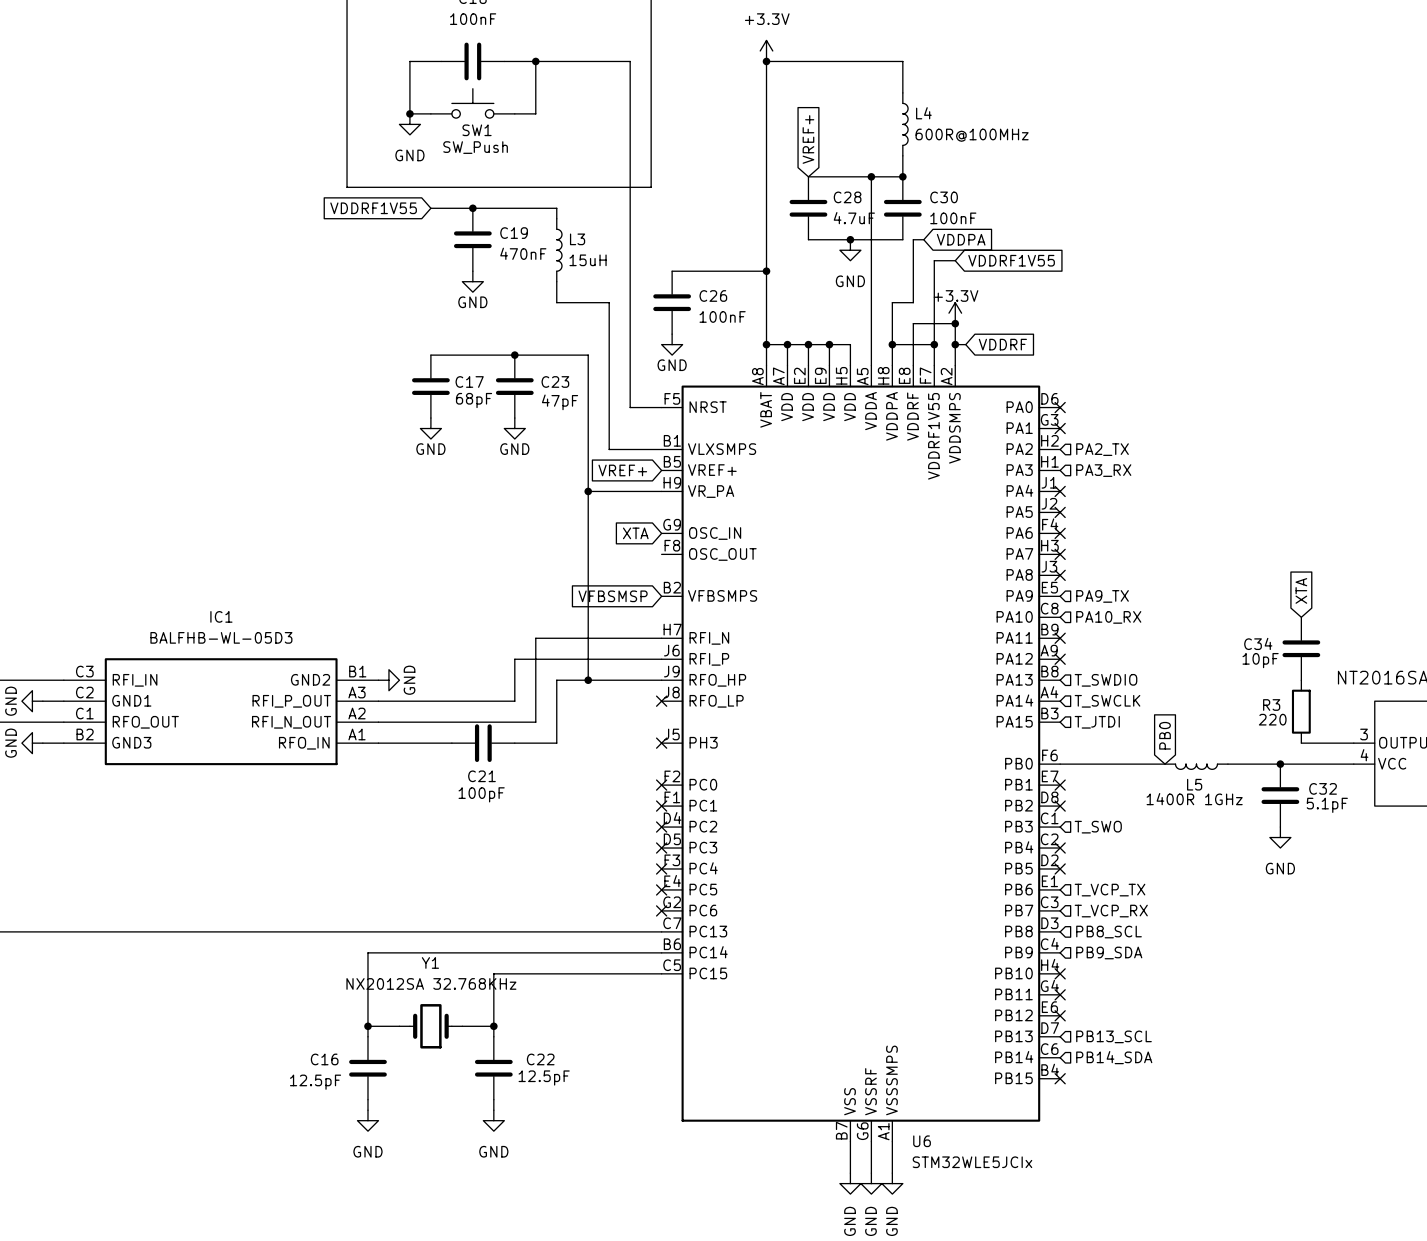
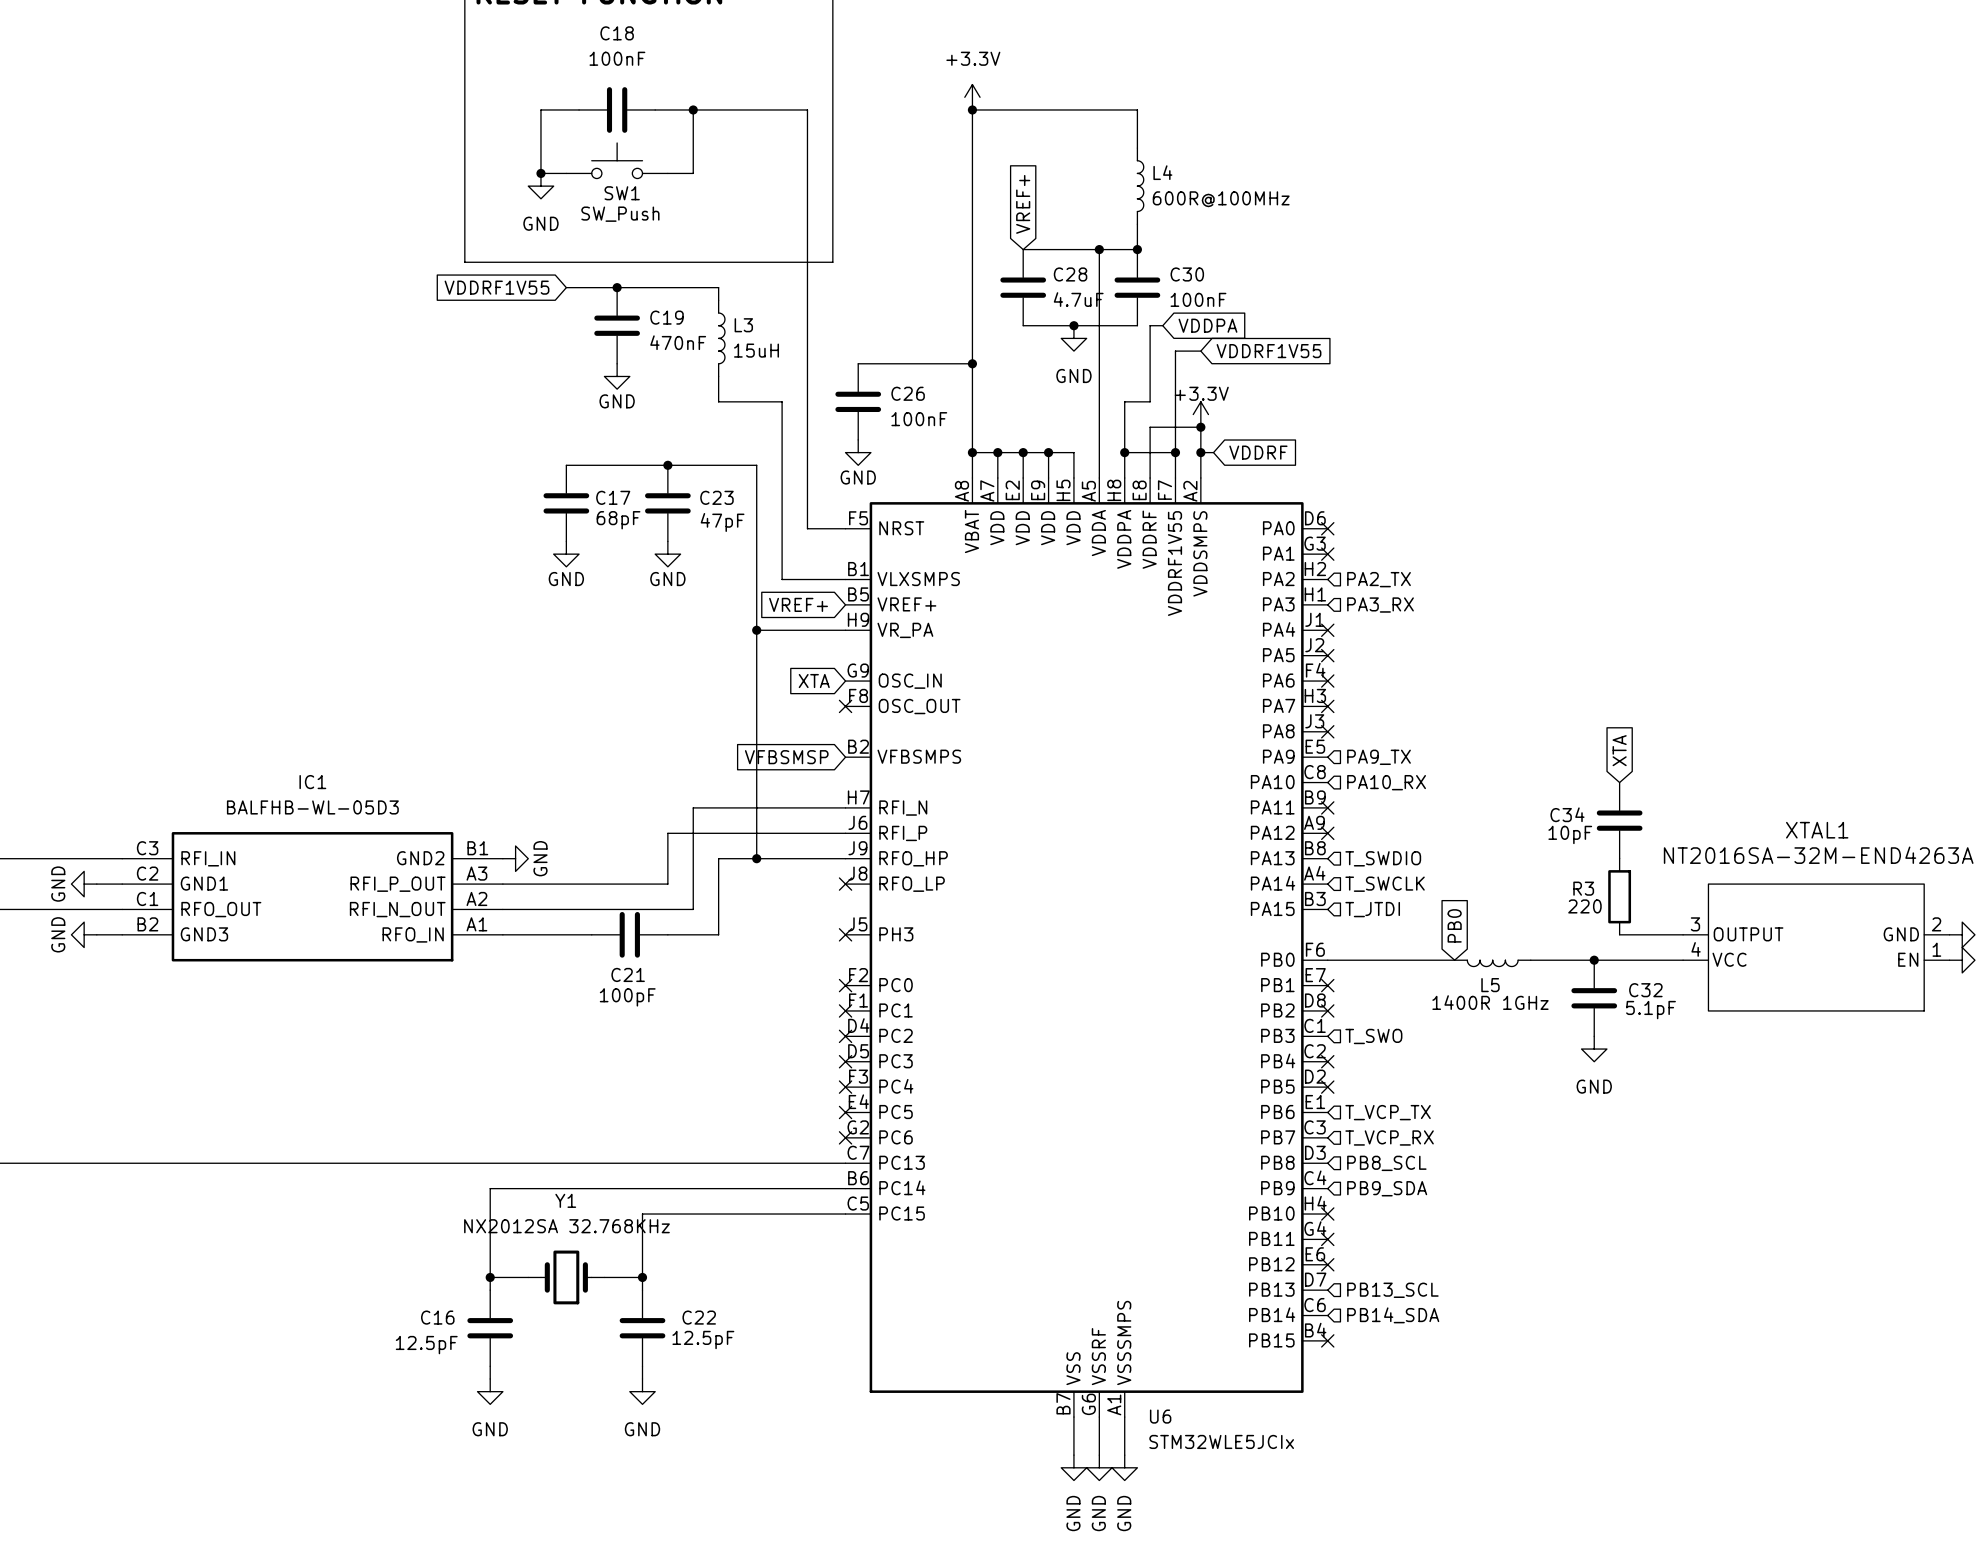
no-connect mark: none -> (845, 706)

